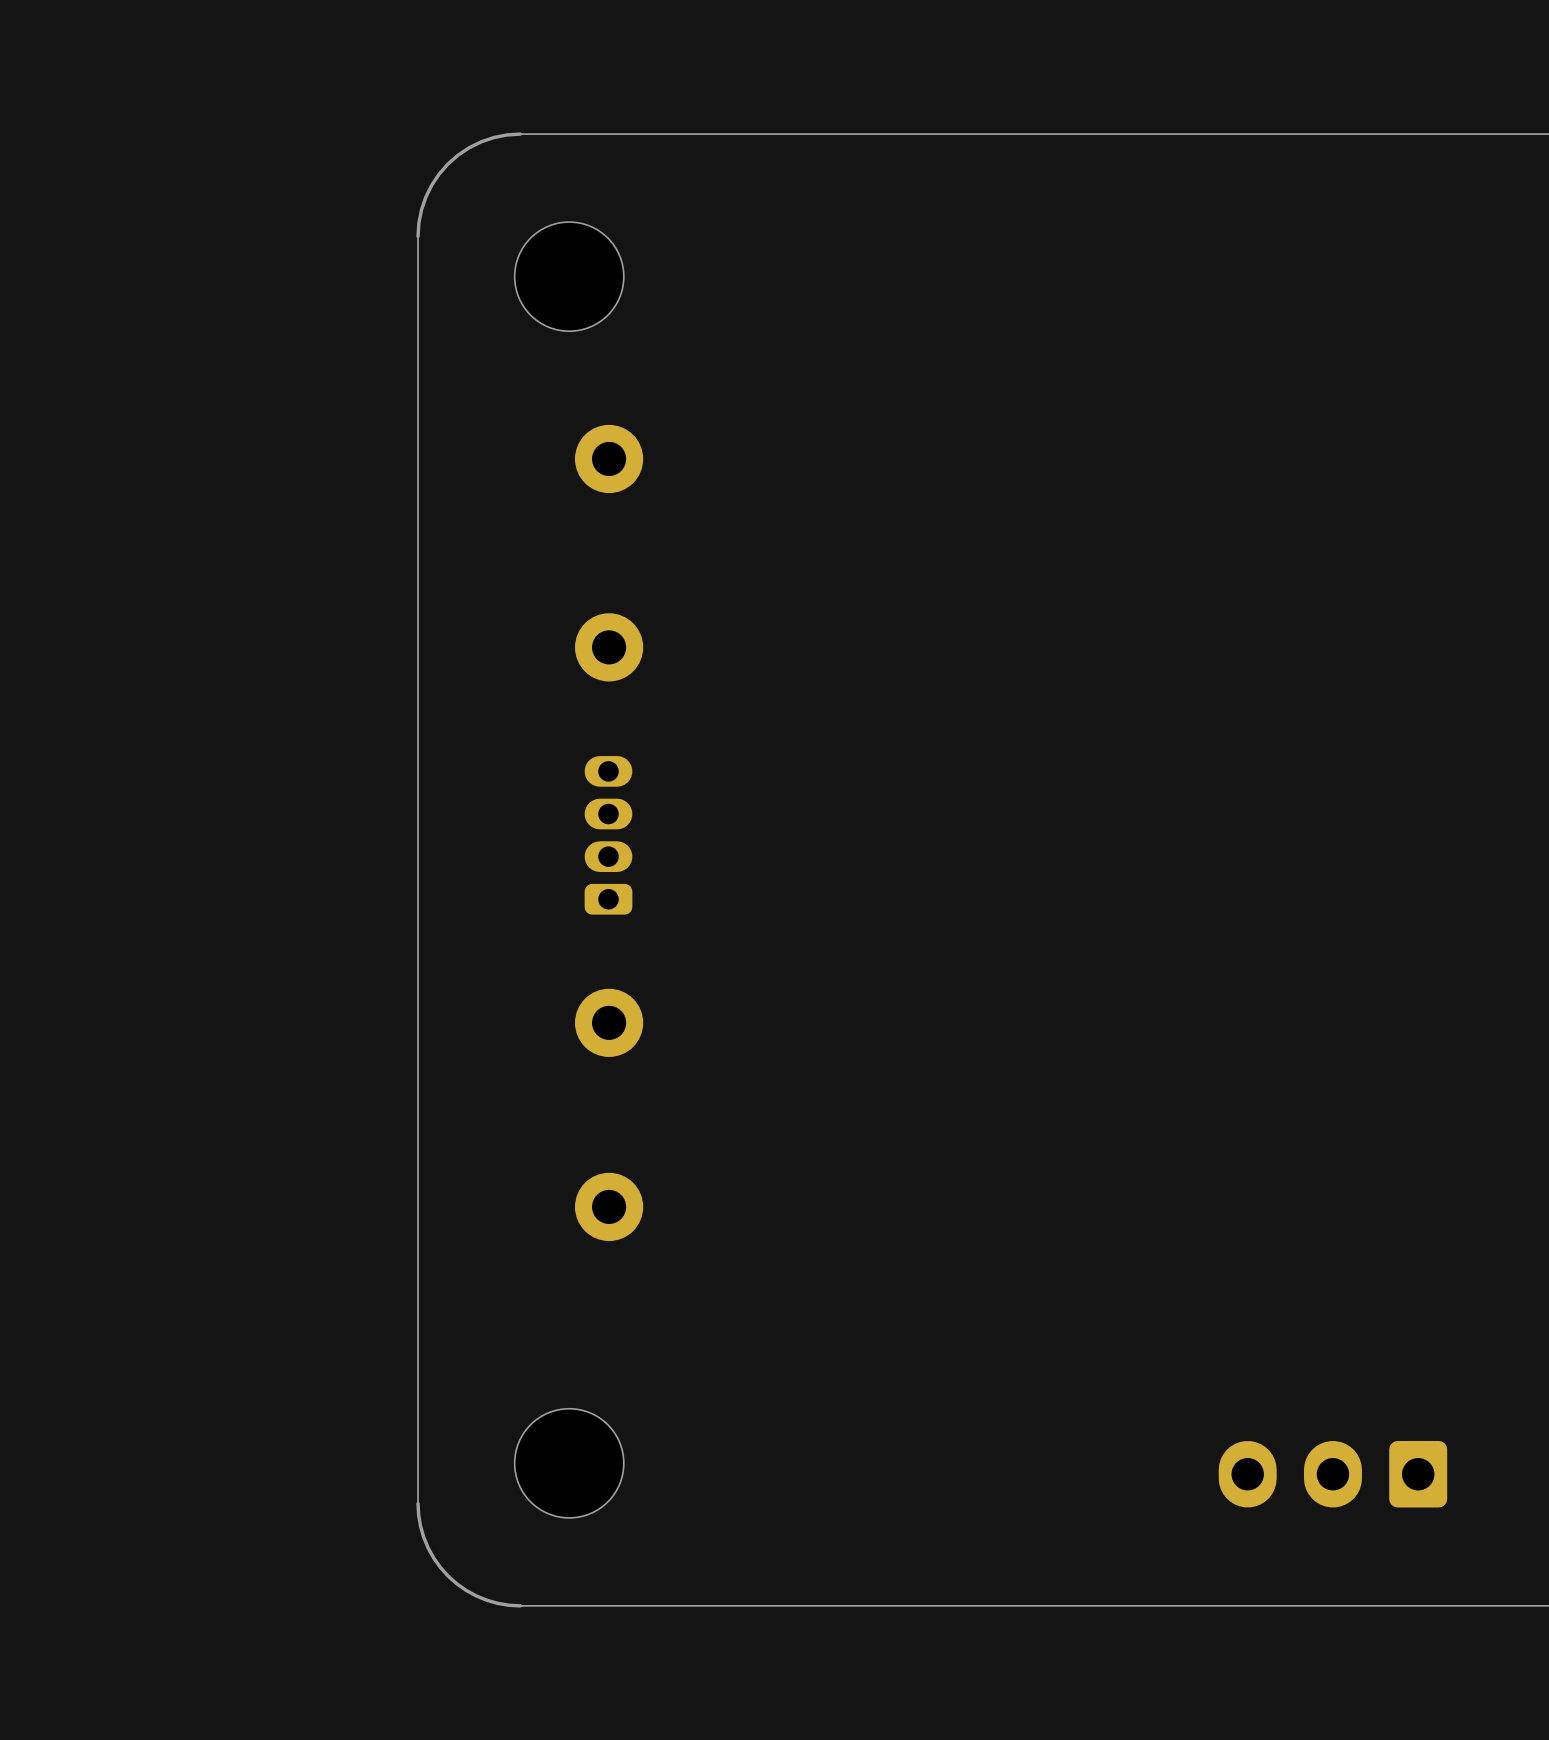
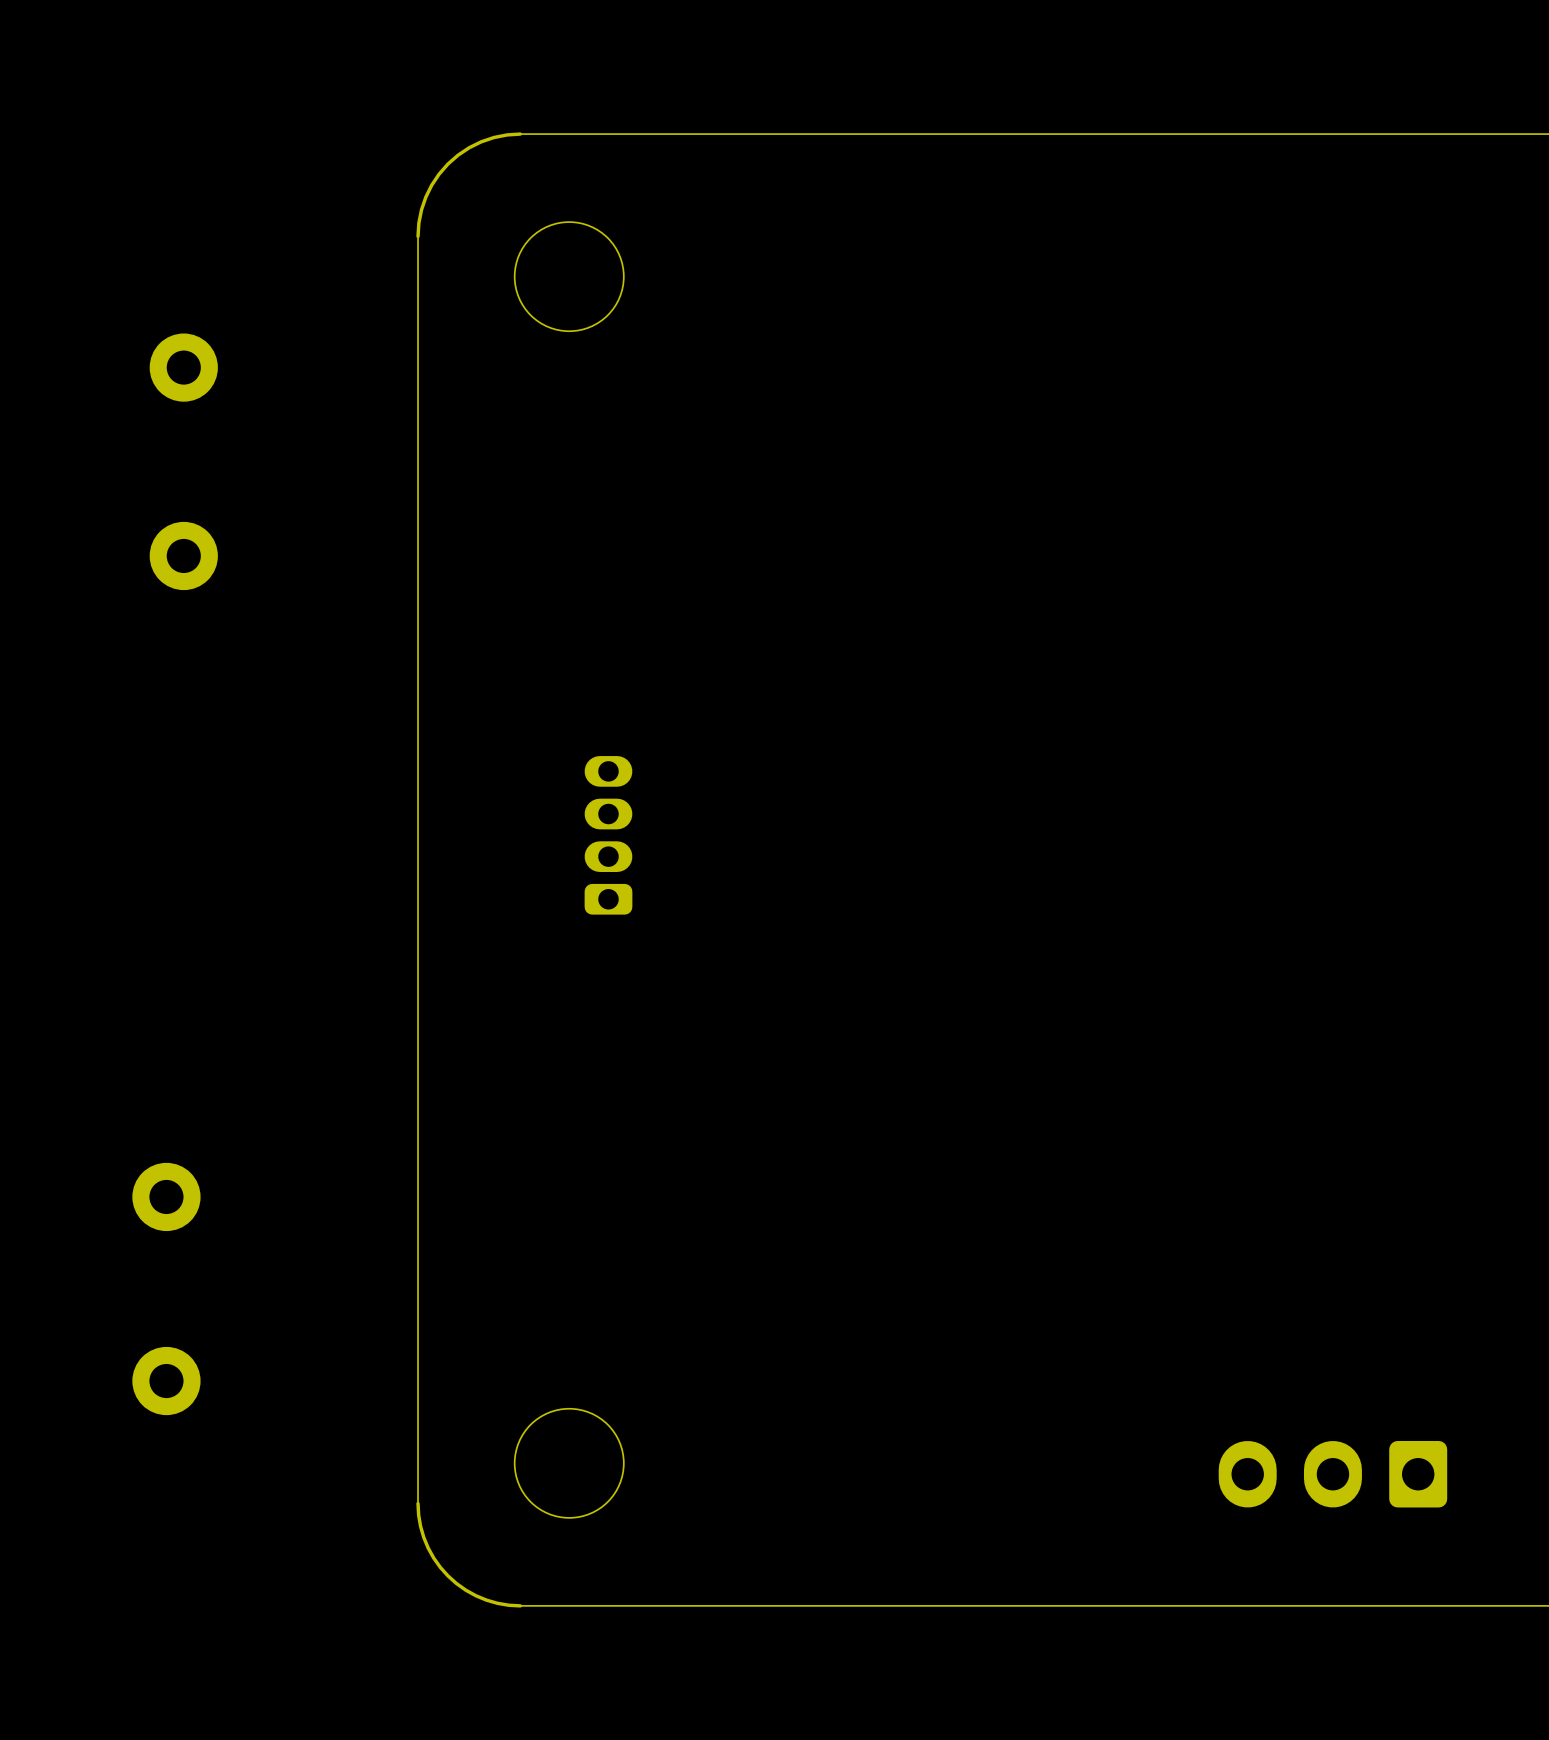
part: none -> (183, 367)
part: (609, 458) -> none
part: none -> (183, 555)
part: (609, 647) -> none
part: (609, 1022) -> none
part: none -> (166, 1196)
part: (609, 1206) -> none
part: none -> (166, 1381)

